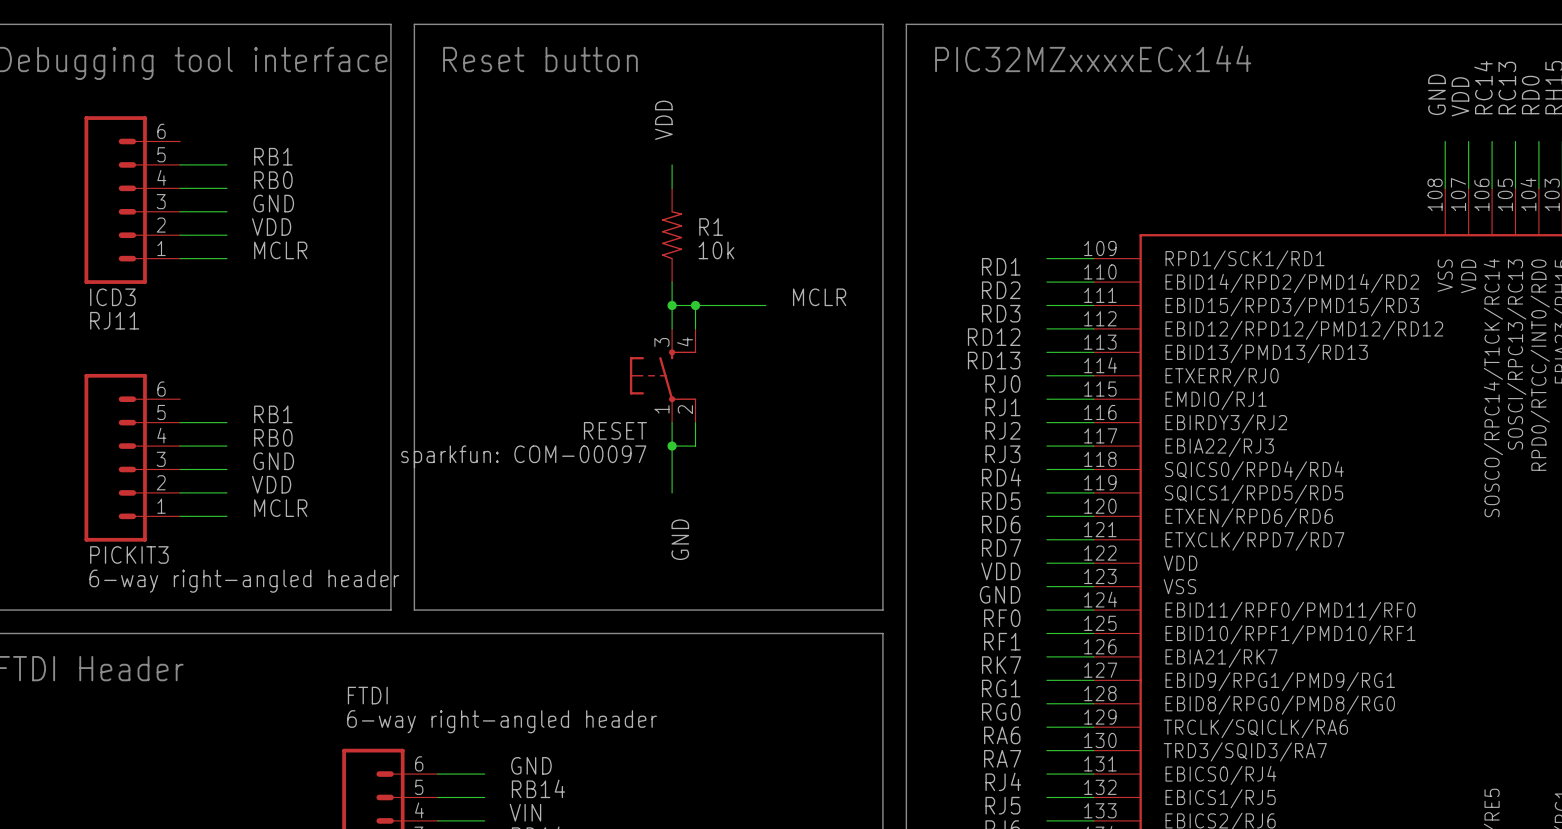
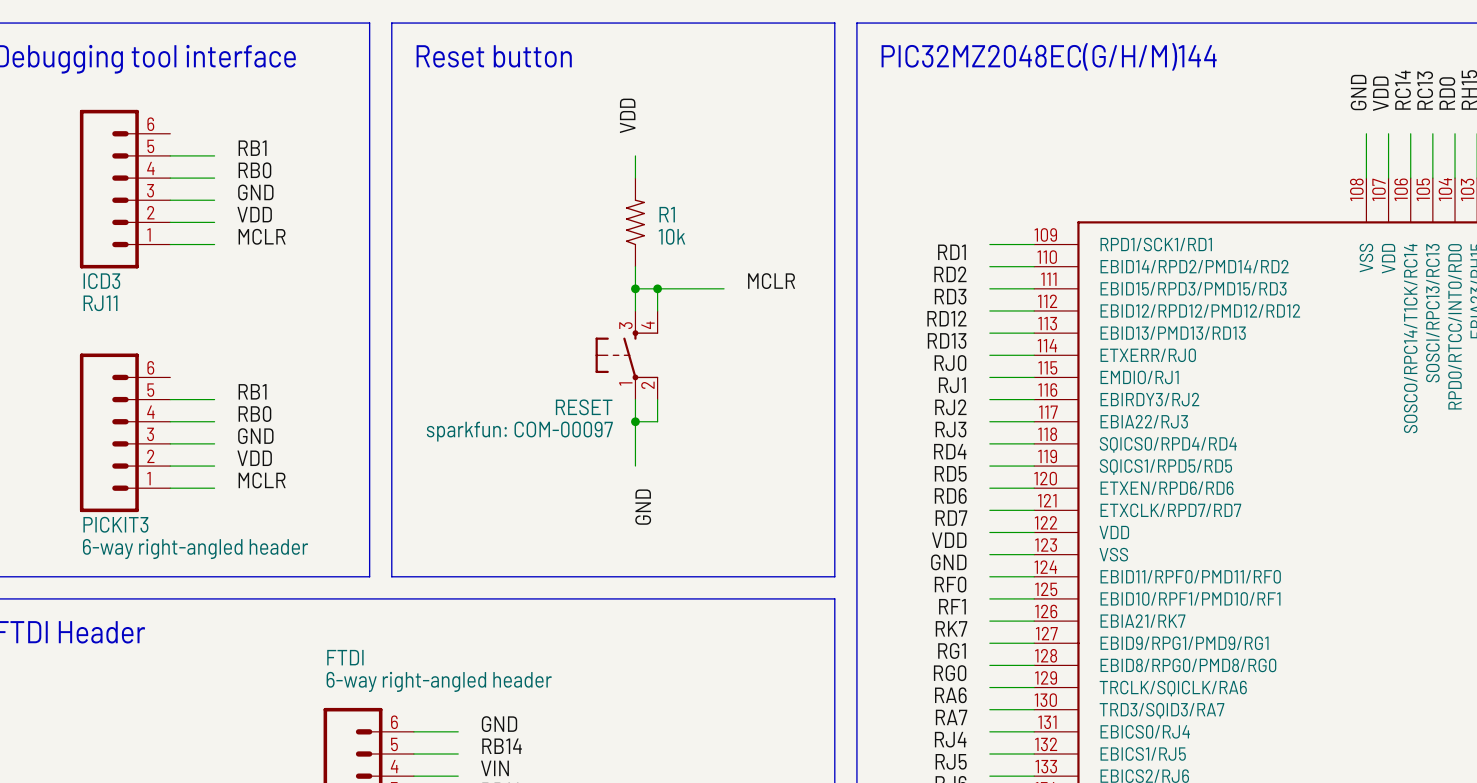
text: PIC32MZxxxxECx144 (1093, 58) -> PIC32MZ2048EC(G/H/M)144 (1049, 56)

